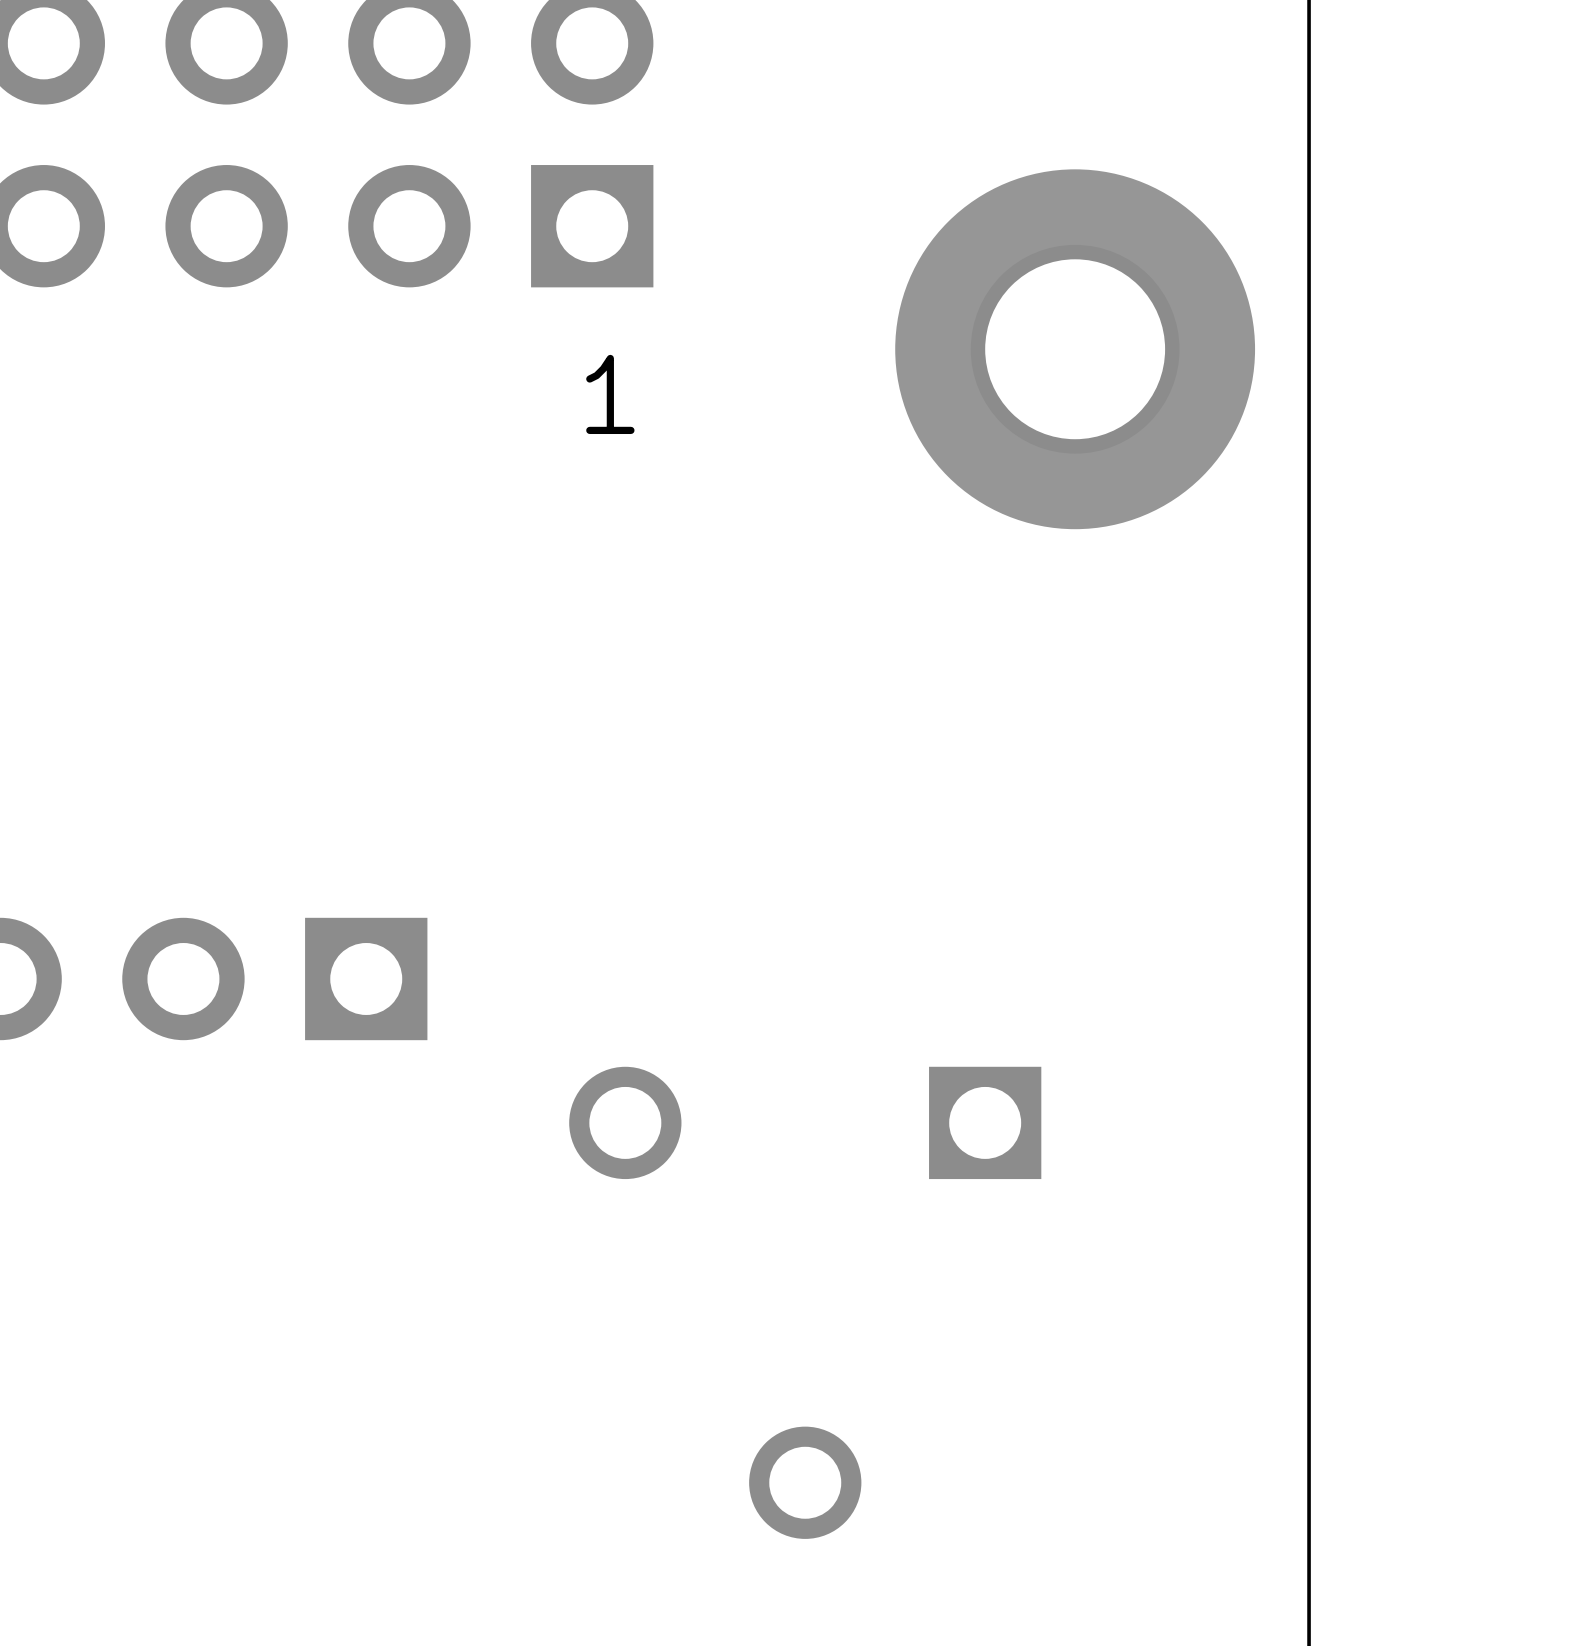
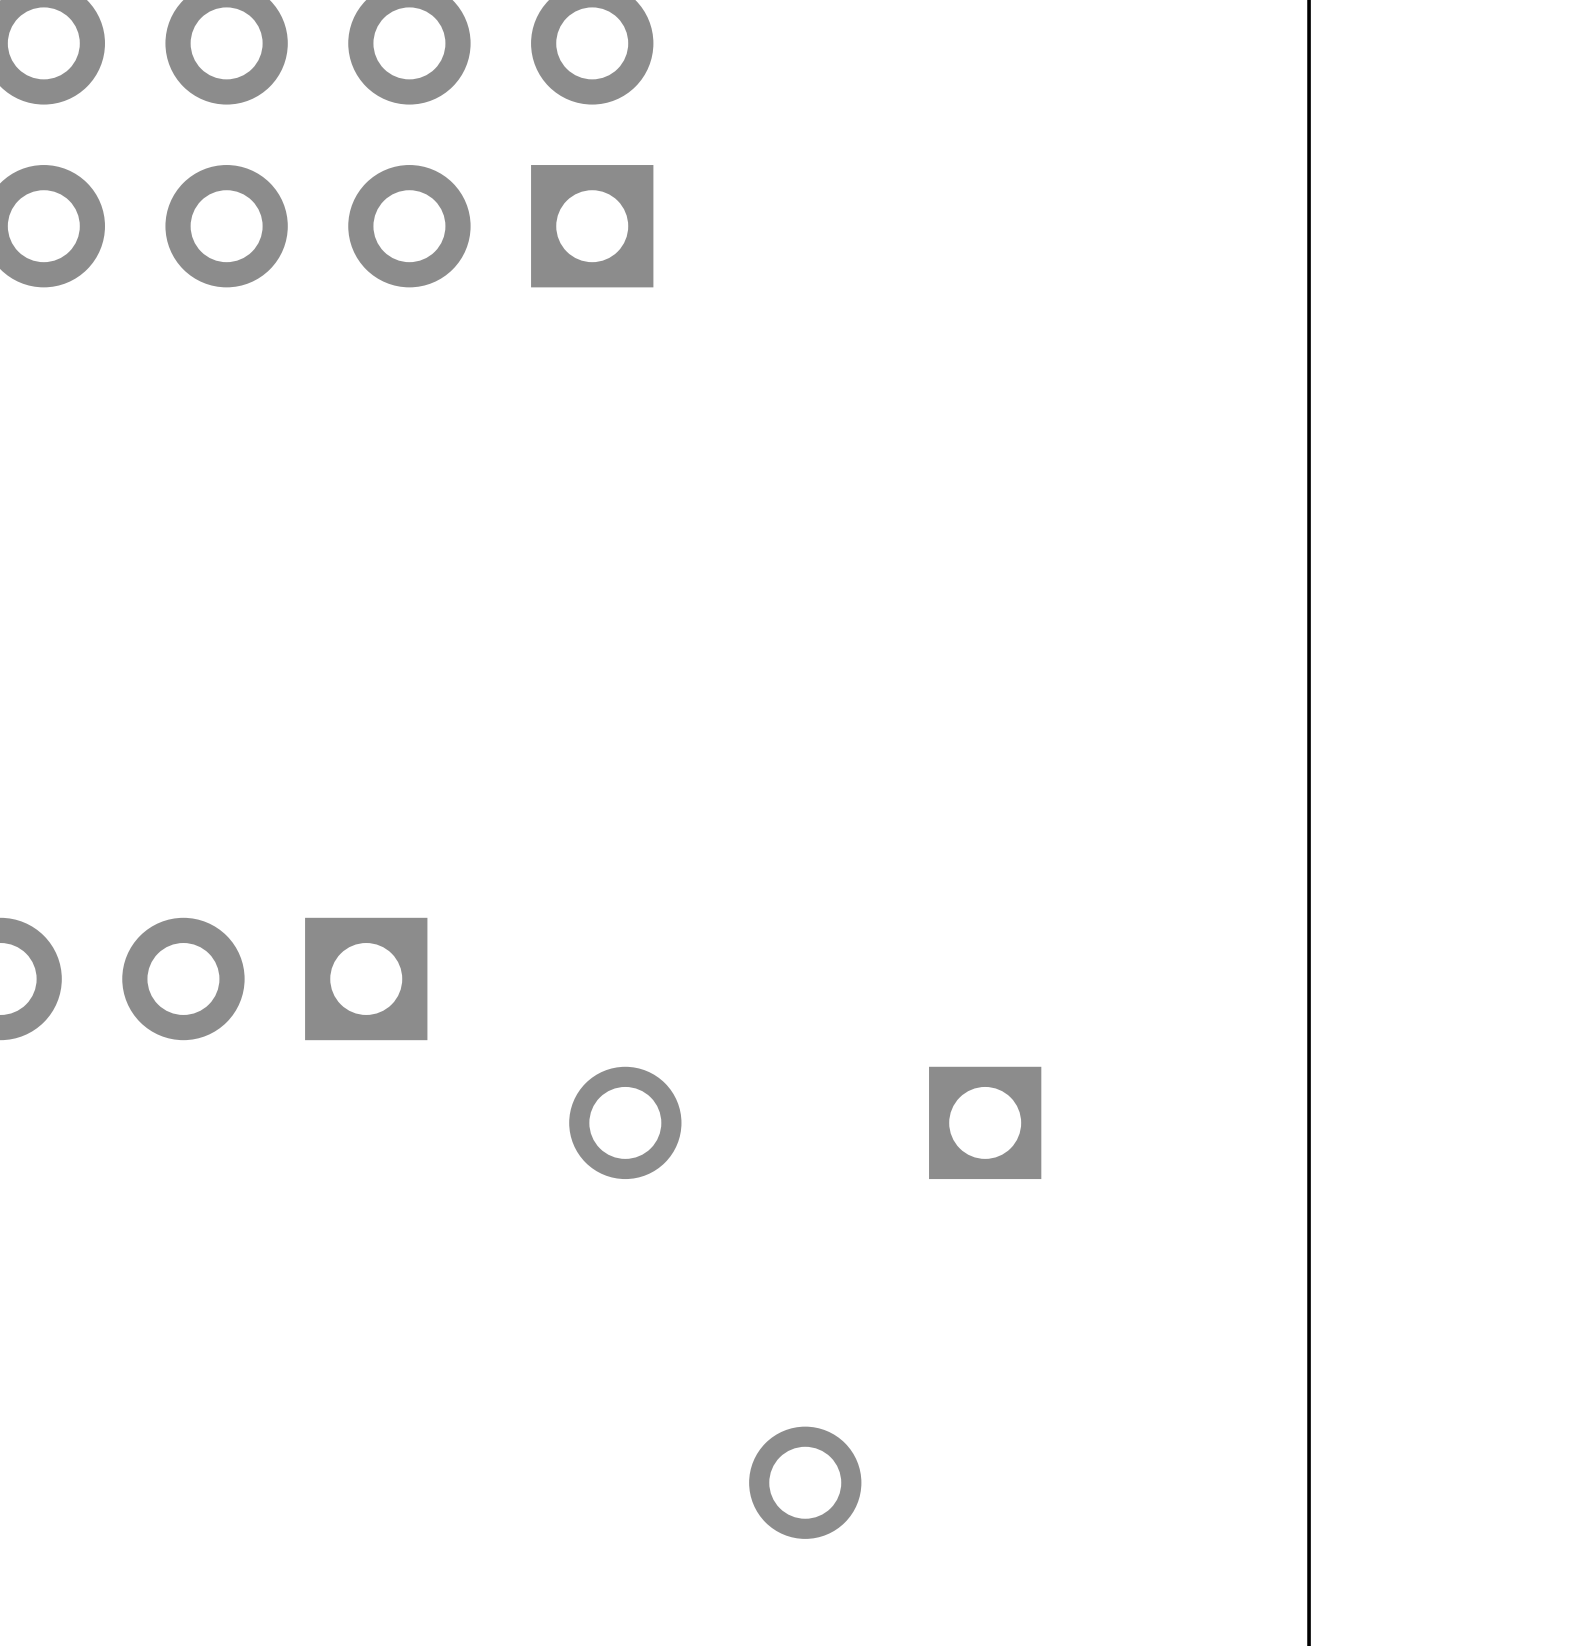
part: (1075, 349) -> none
text: 1 (610, 394) -> none

